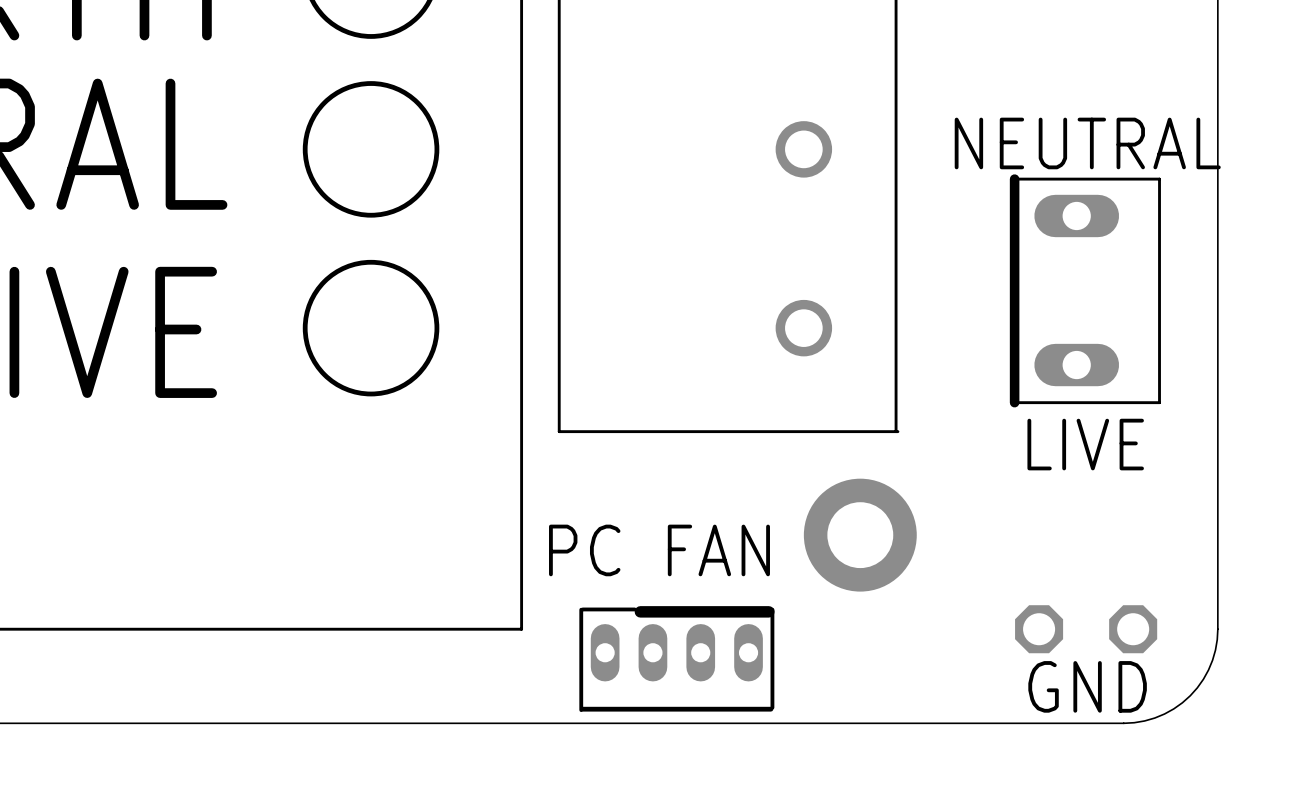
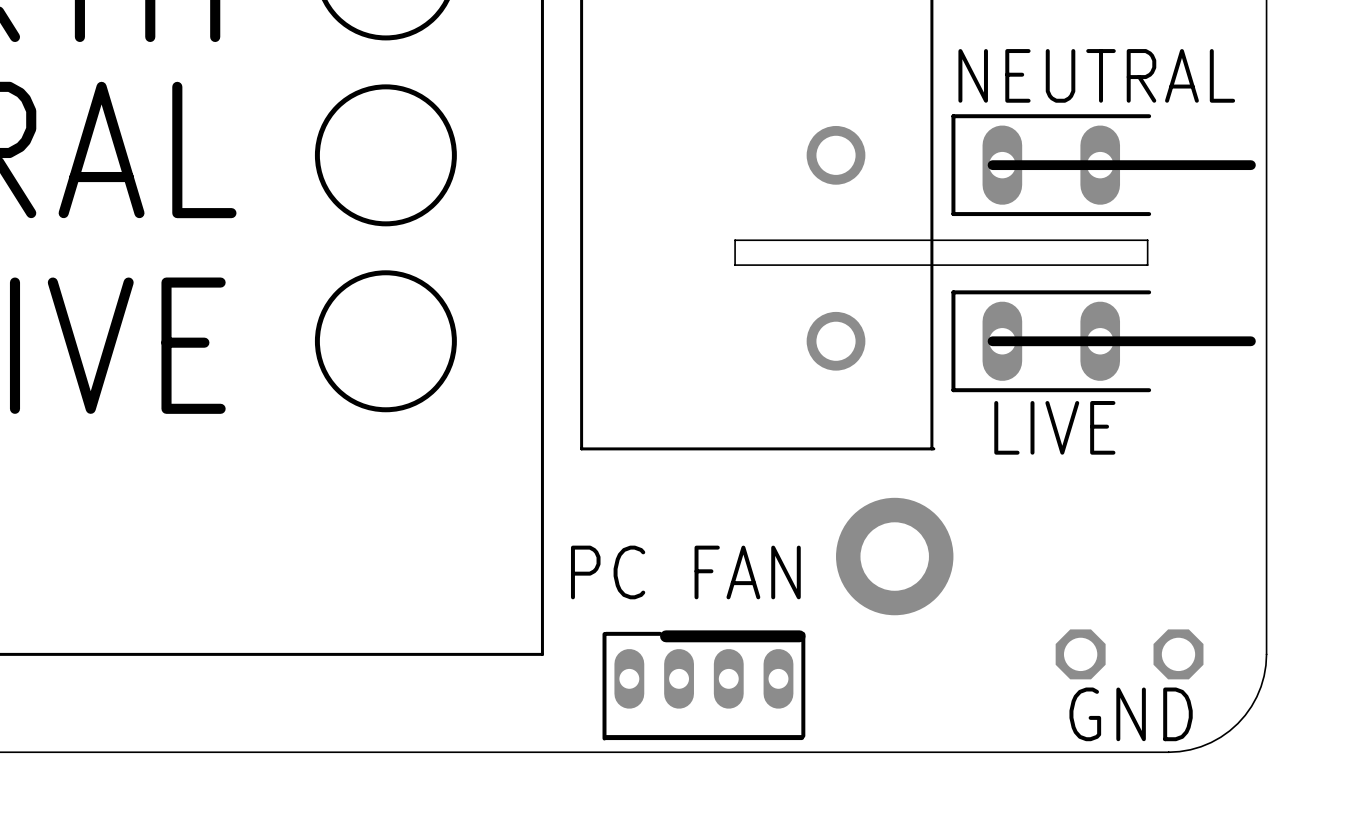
text position: NEUTRAL (1087, 143) -> NEUTRAL (1096, 75)
part: none -> (1103, 165)
board edge: none -> (735, 240) (1147, 240) (1147, 265) (735, 265) (735, 240)
part: (1085, 290) -> none
part: none -> (1103, 341)
text position: LIVE (1085, 444) -> LIVE (1054, 427)

